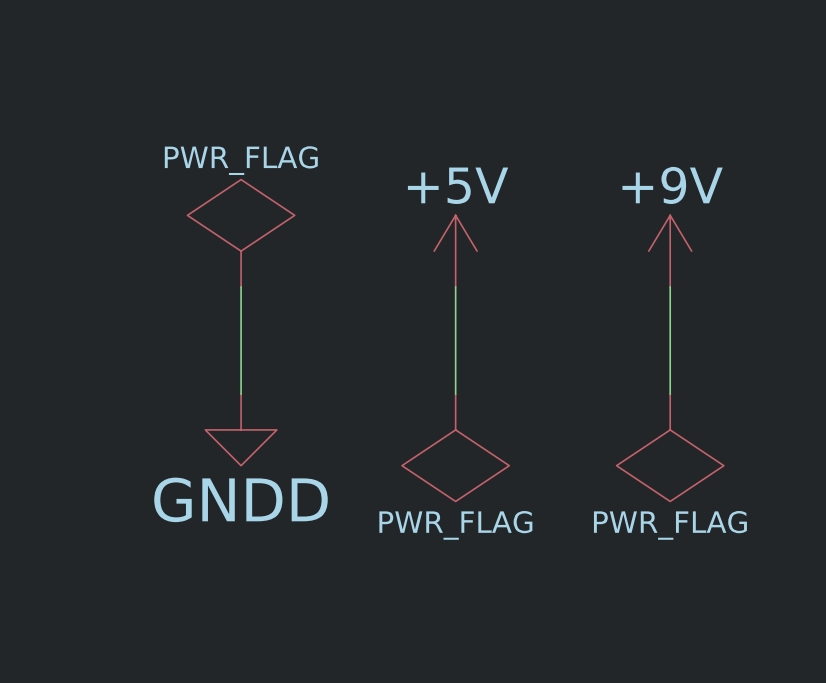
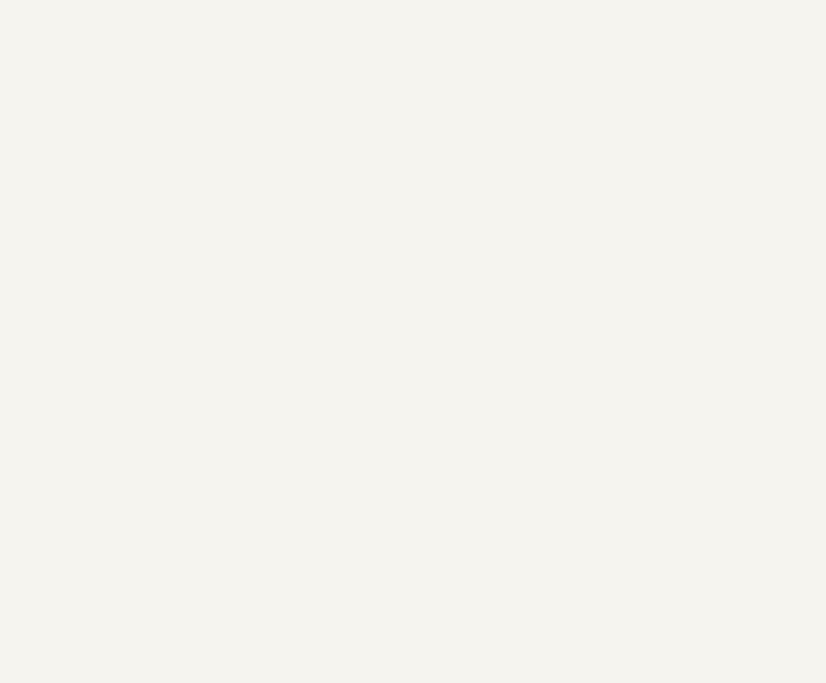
power symbol: PWR_FLAG (241, 233) -> none
power symbol: +5V (455, 251) -> none
power symbol: +9V (670, 251) -> none
wire: (241, 286) (241, 394) -> none
wire: (455, 286) (455, 394) -> none
wire: (670, 286) (670, 394) -> none
power symbol: GNDD (241, 429) -> none
power symbol: PWR_FLAG (455, 447) -> none
power symbol: PWR_FLAG (670, 447) -> none

